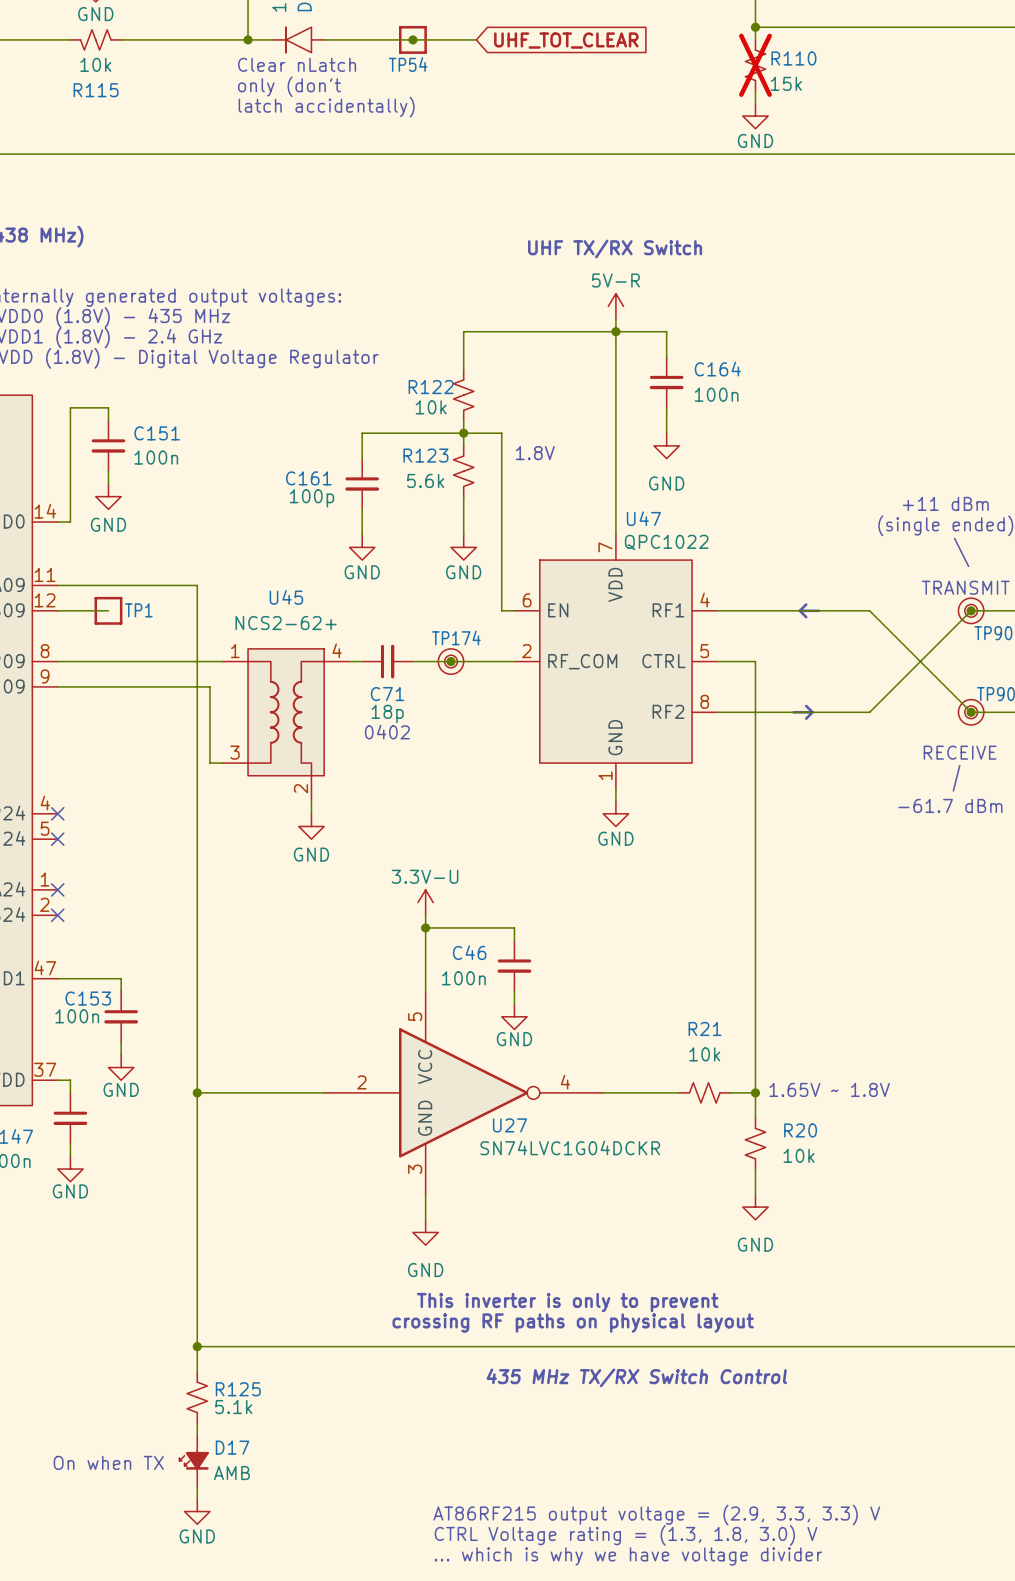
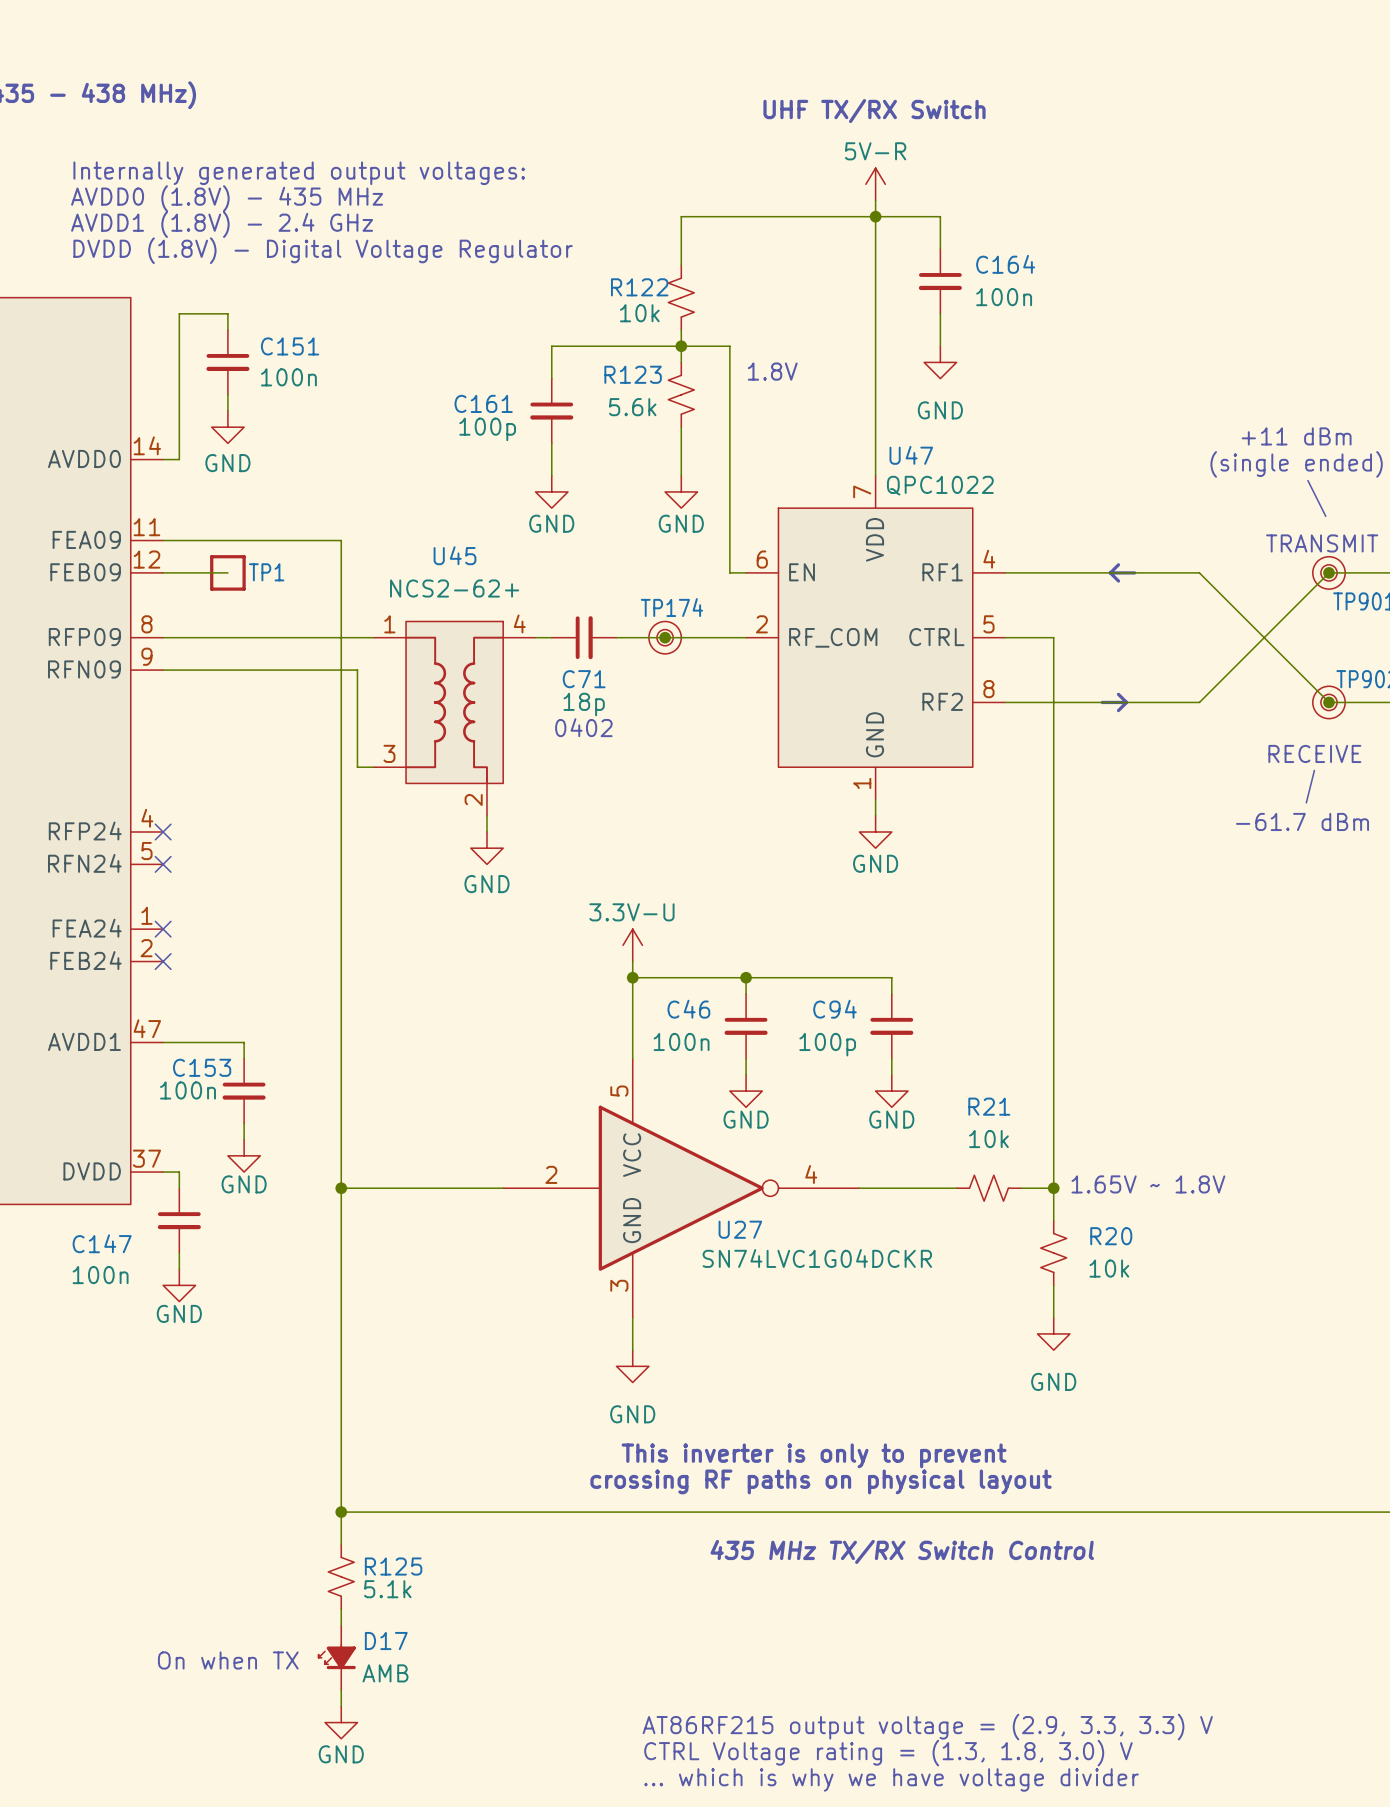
wire: none -> (746, 977) (891, 977) (891, 993)
junction: none -> (746, 977)
C94: none -> 100p (891, 1026)
wire: none -> (891, 1058) (891, 1074)
power symbol: none -> GND (891, 1091)

